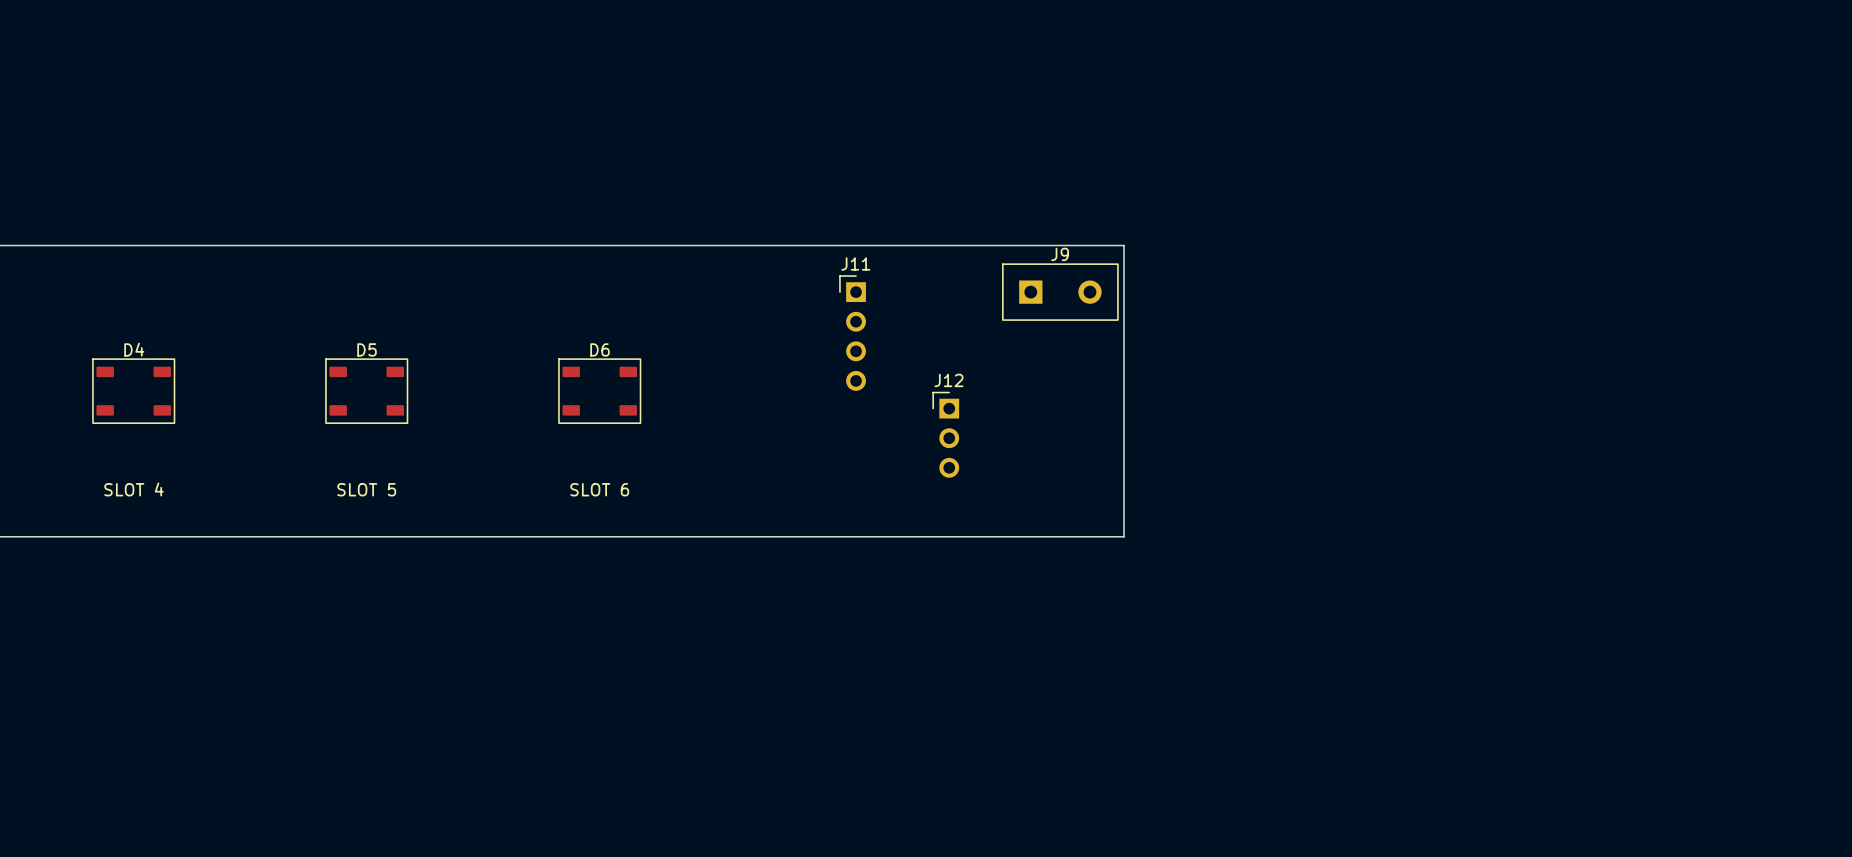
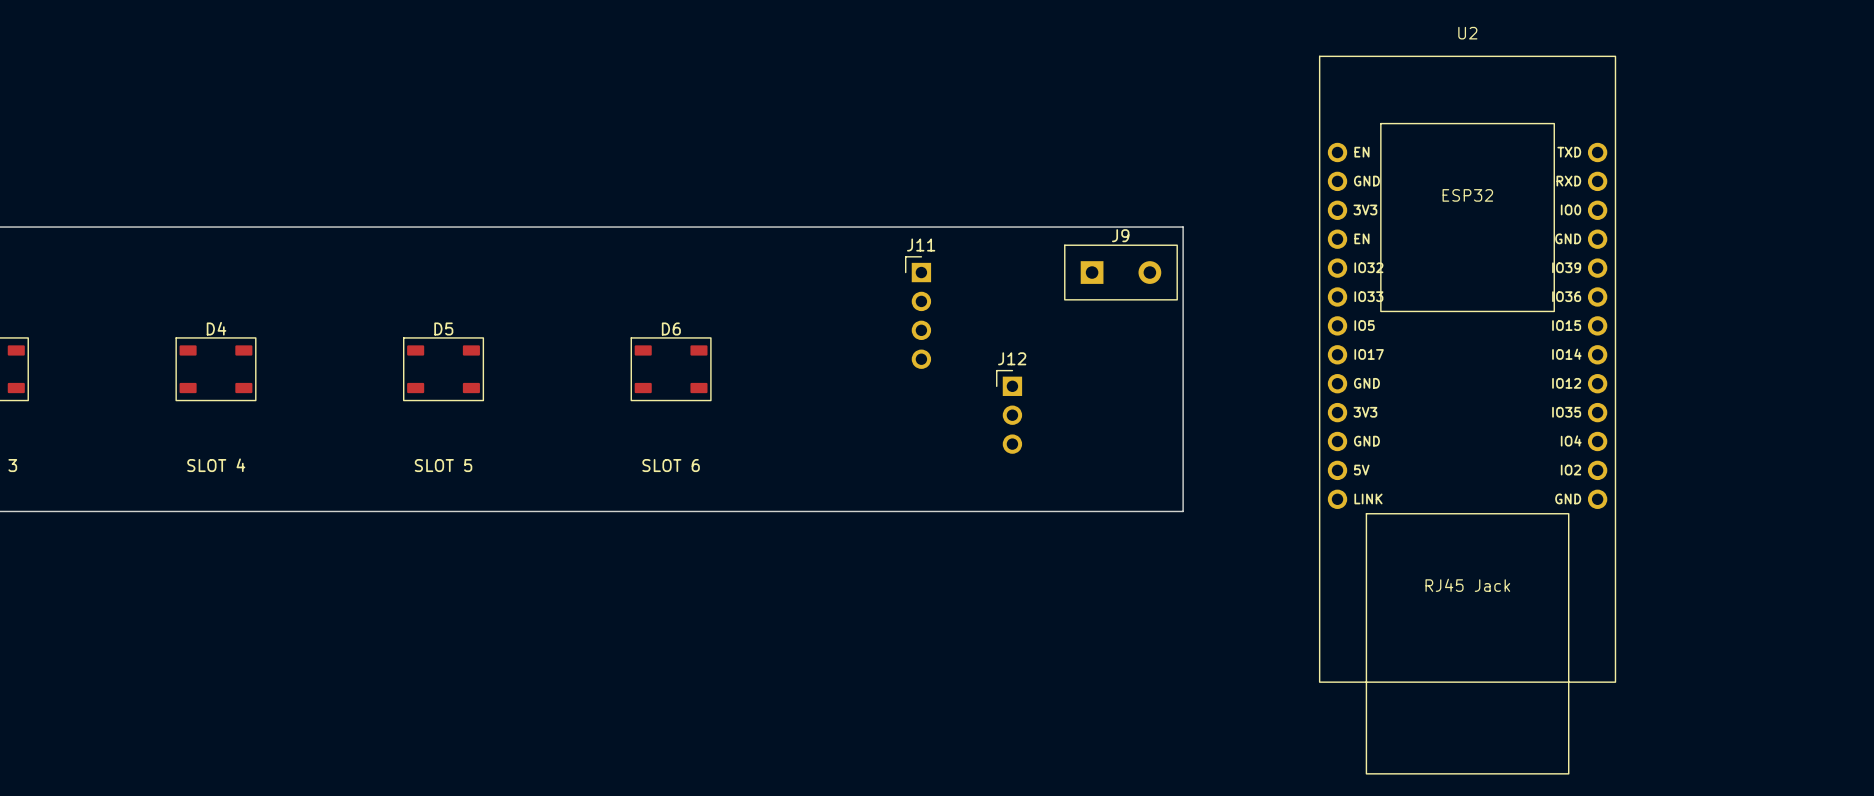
U2: none -> (1467, 415)

